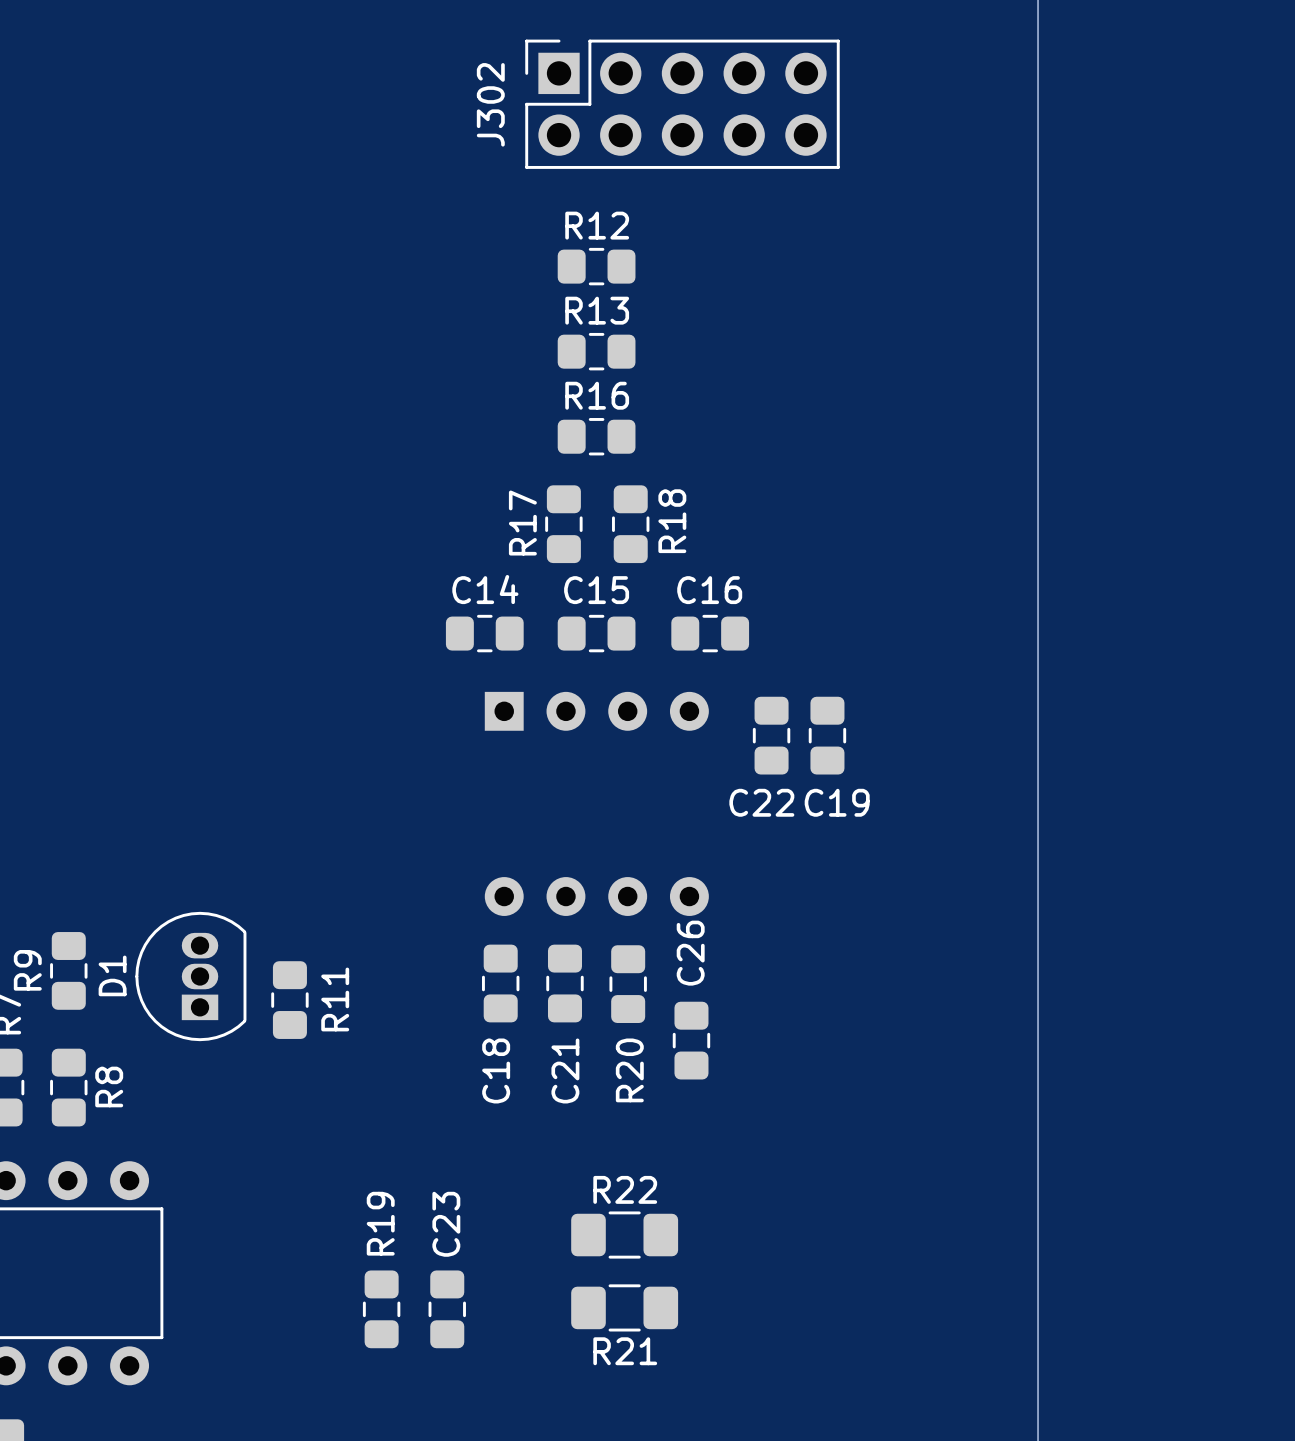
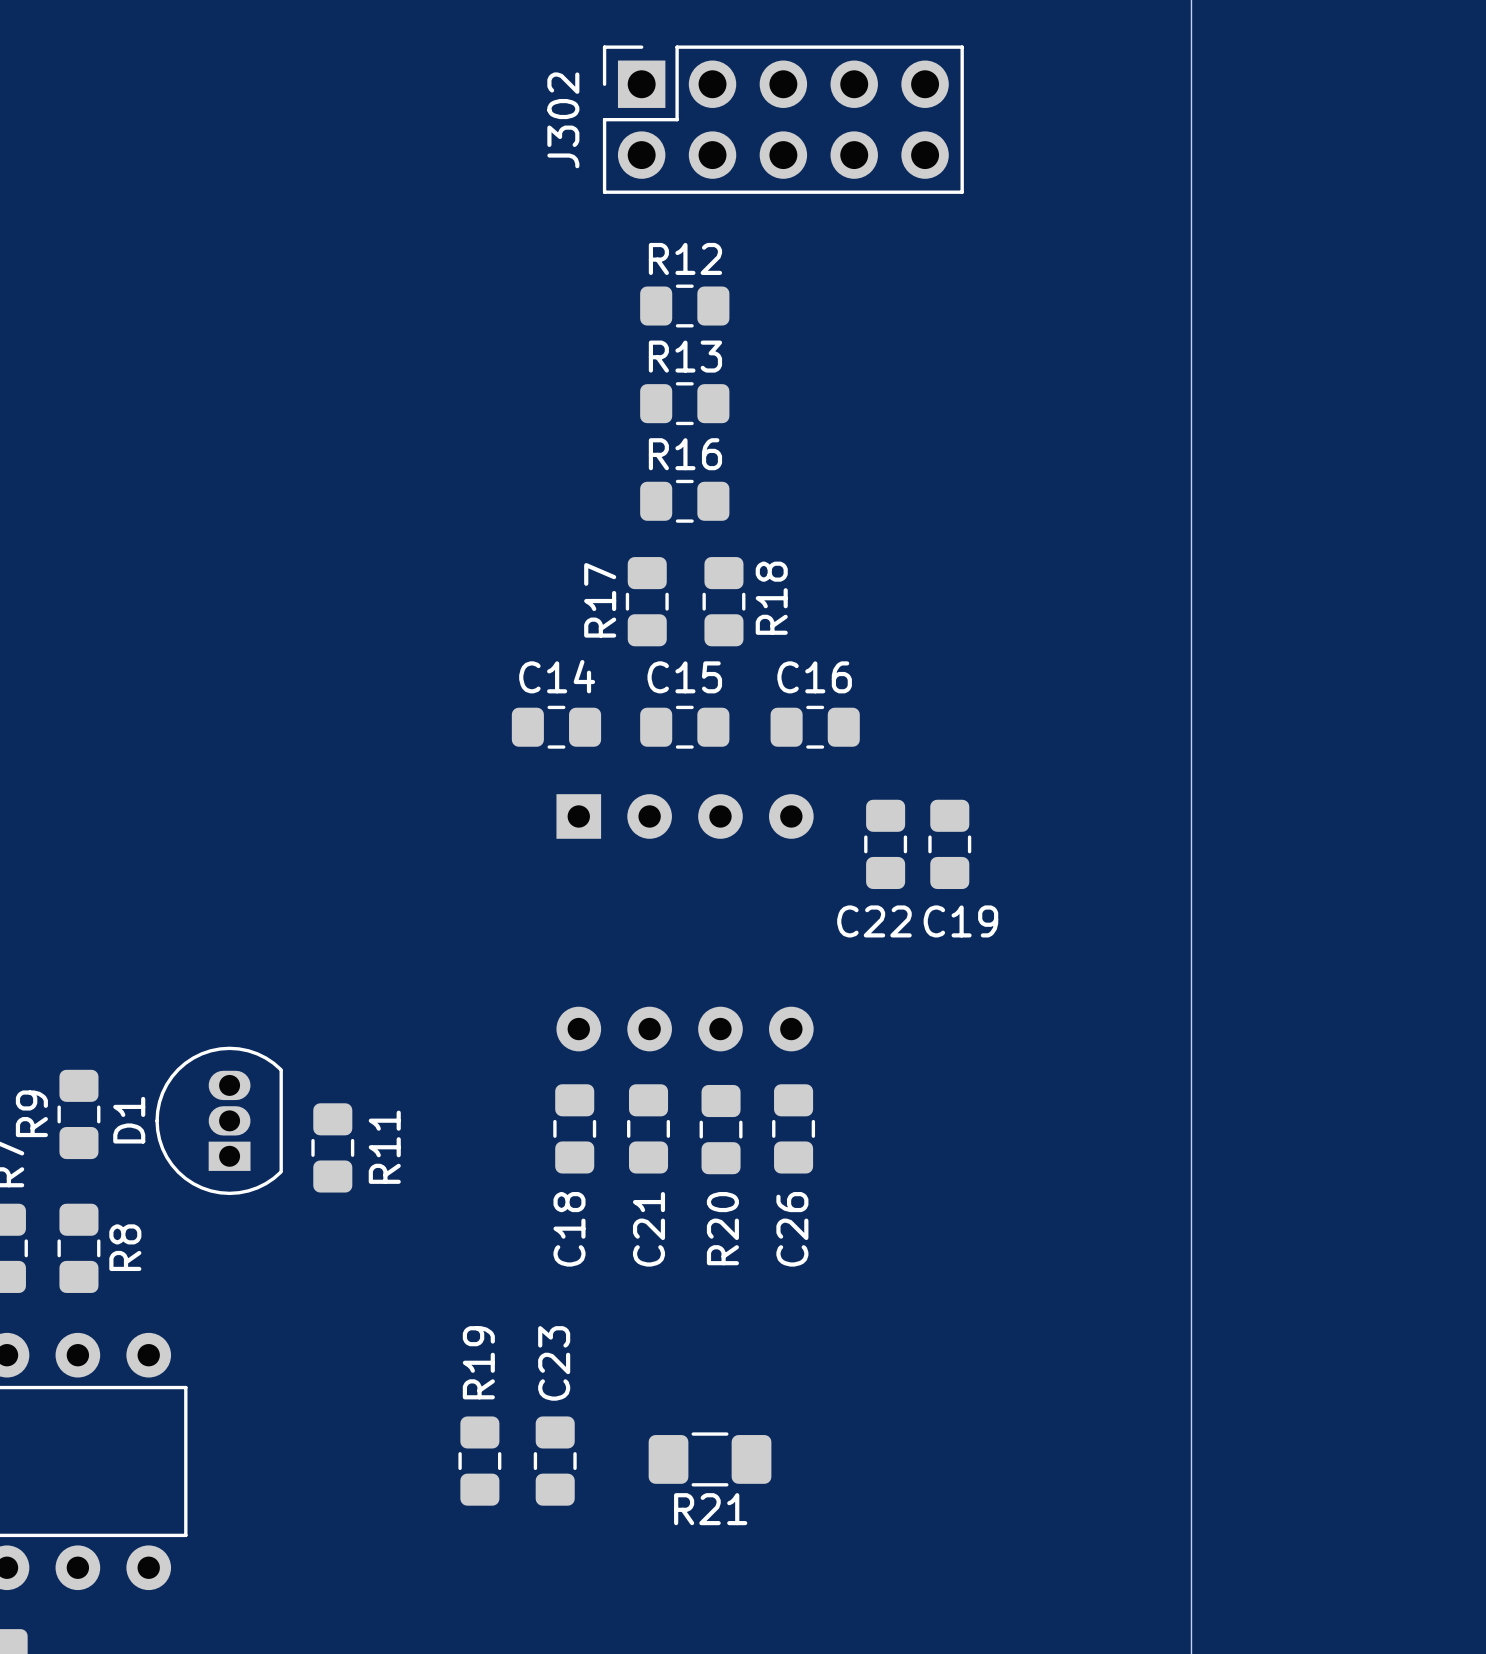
C26 name position: C26 (690, 953) -> C26 (792, 1229)
C26 position: (691, 1040) -> (793, 1128)
R22: (624, 1235) -> none
R21 position: (624, 1307) -> (710, 1459)
R19 position: (381, 1309) -> (479, 1461)
C23 position: (447, 1309) -> (555, 1461)

